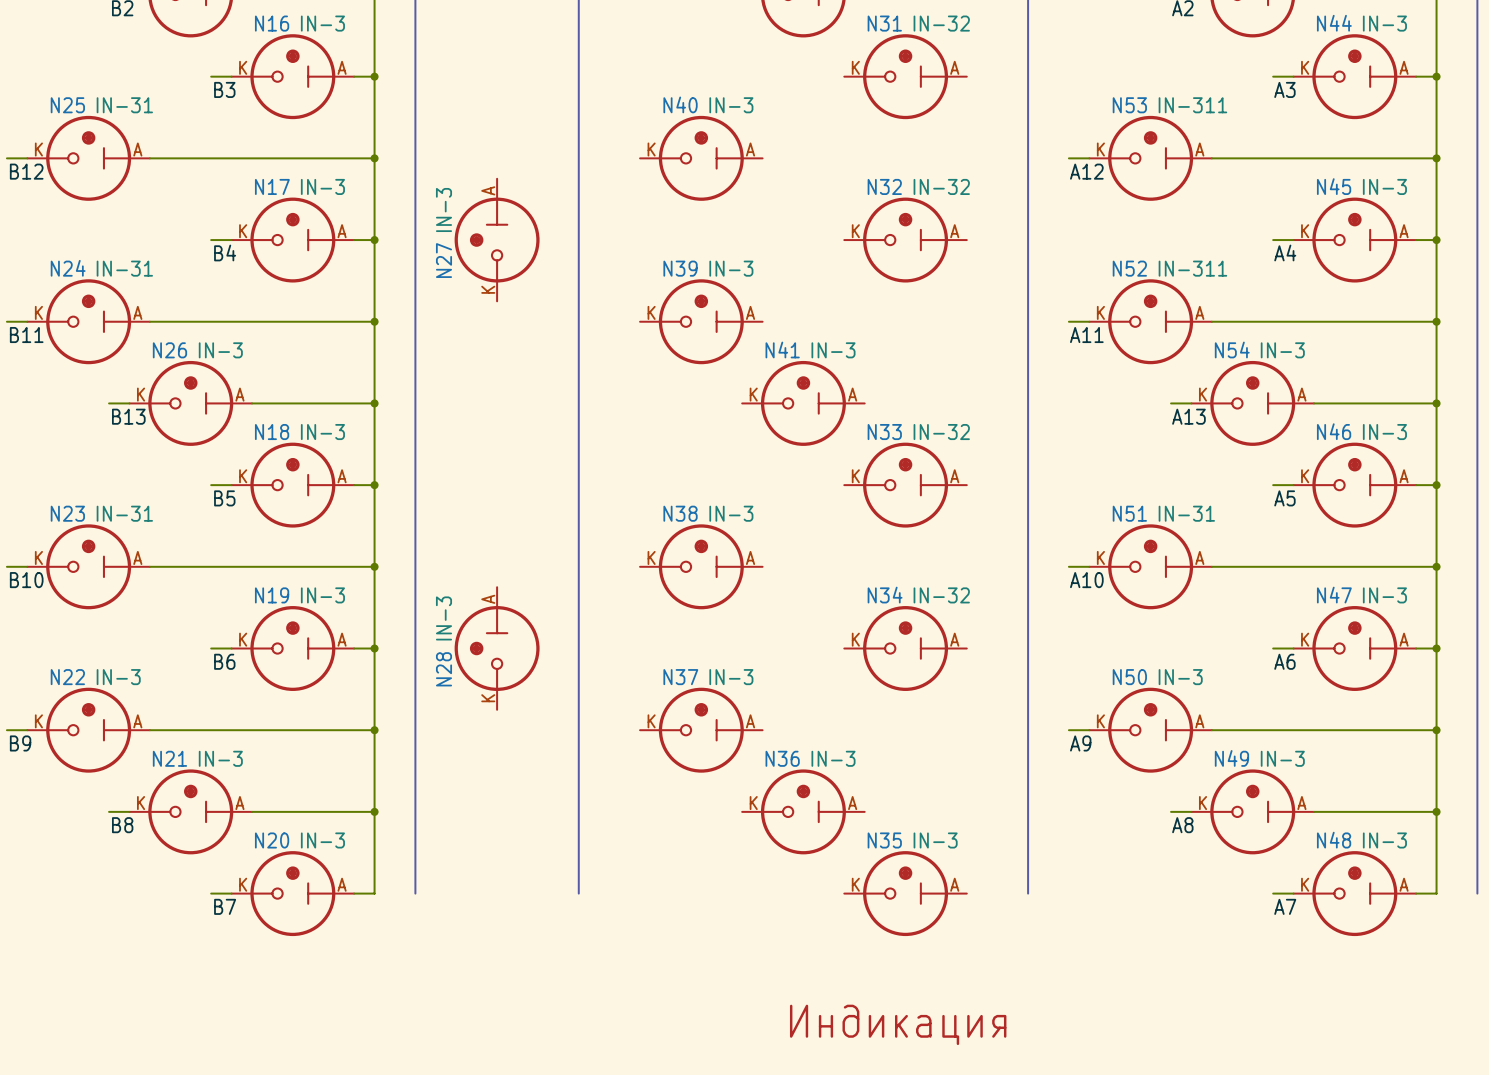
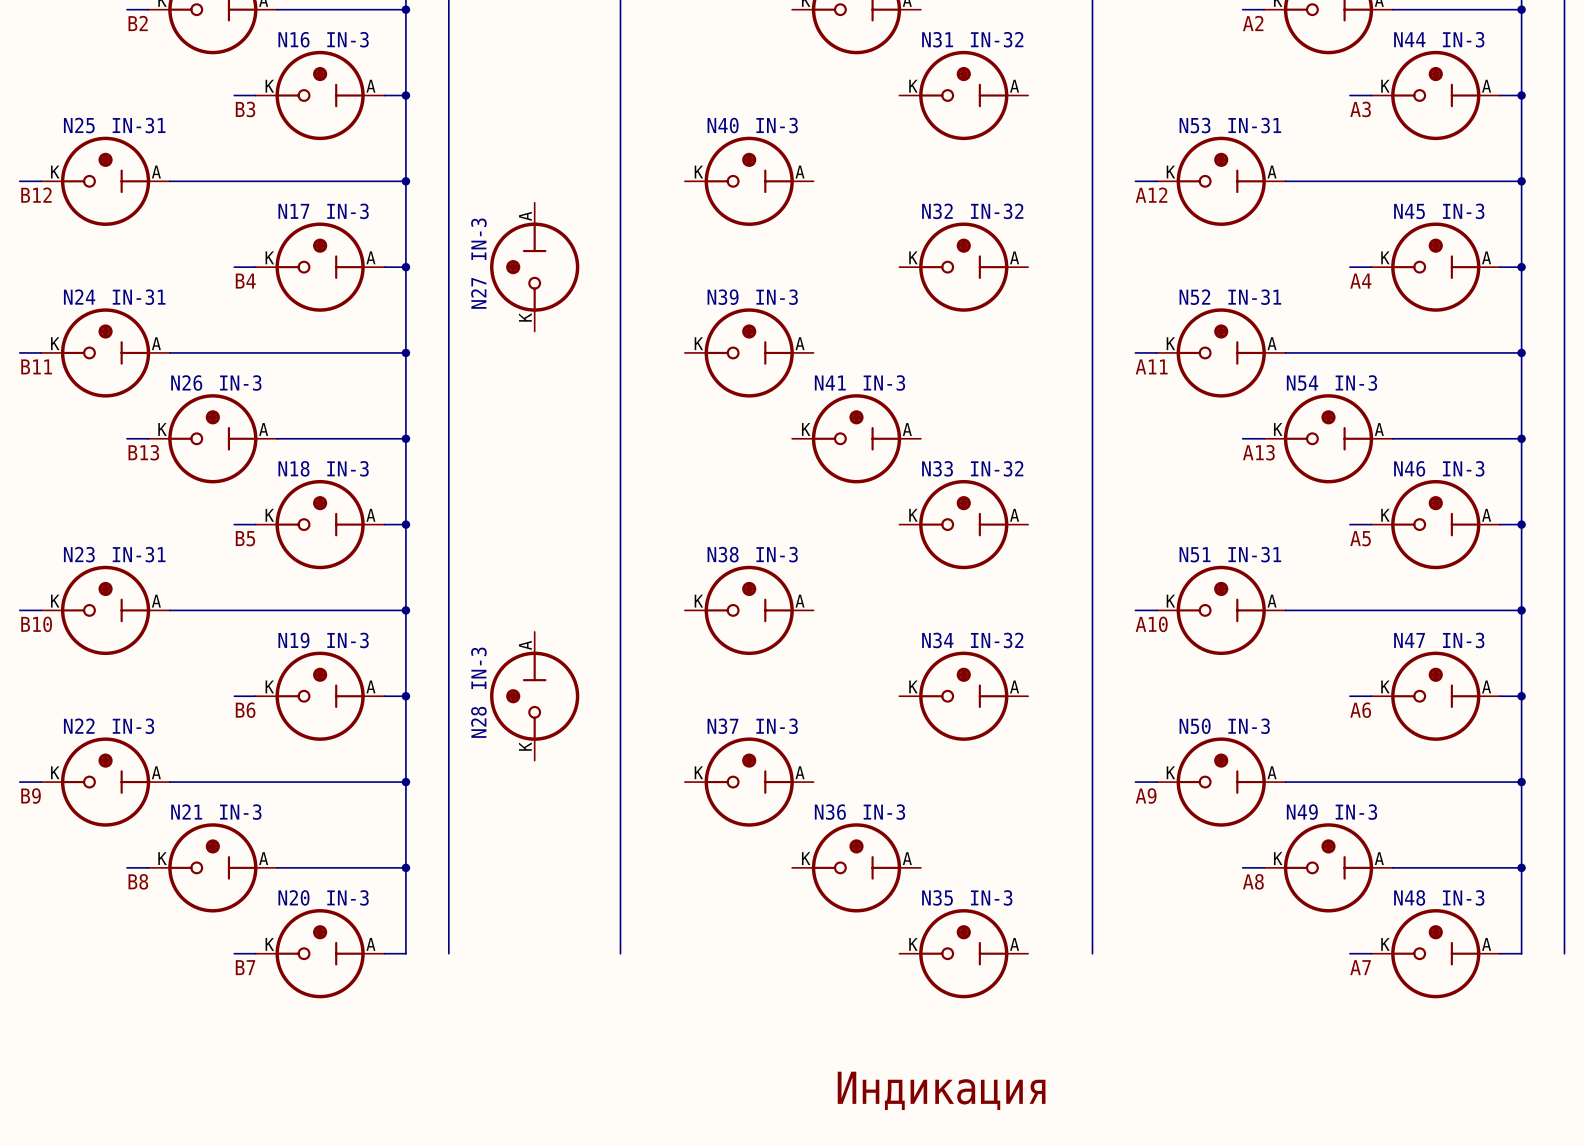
N53 value: IN-311 (1192, 105) -> IN-31 (1254, 125)
N52 value: IN-311 (1192, 268) -> IN-31 (1254, 297)

